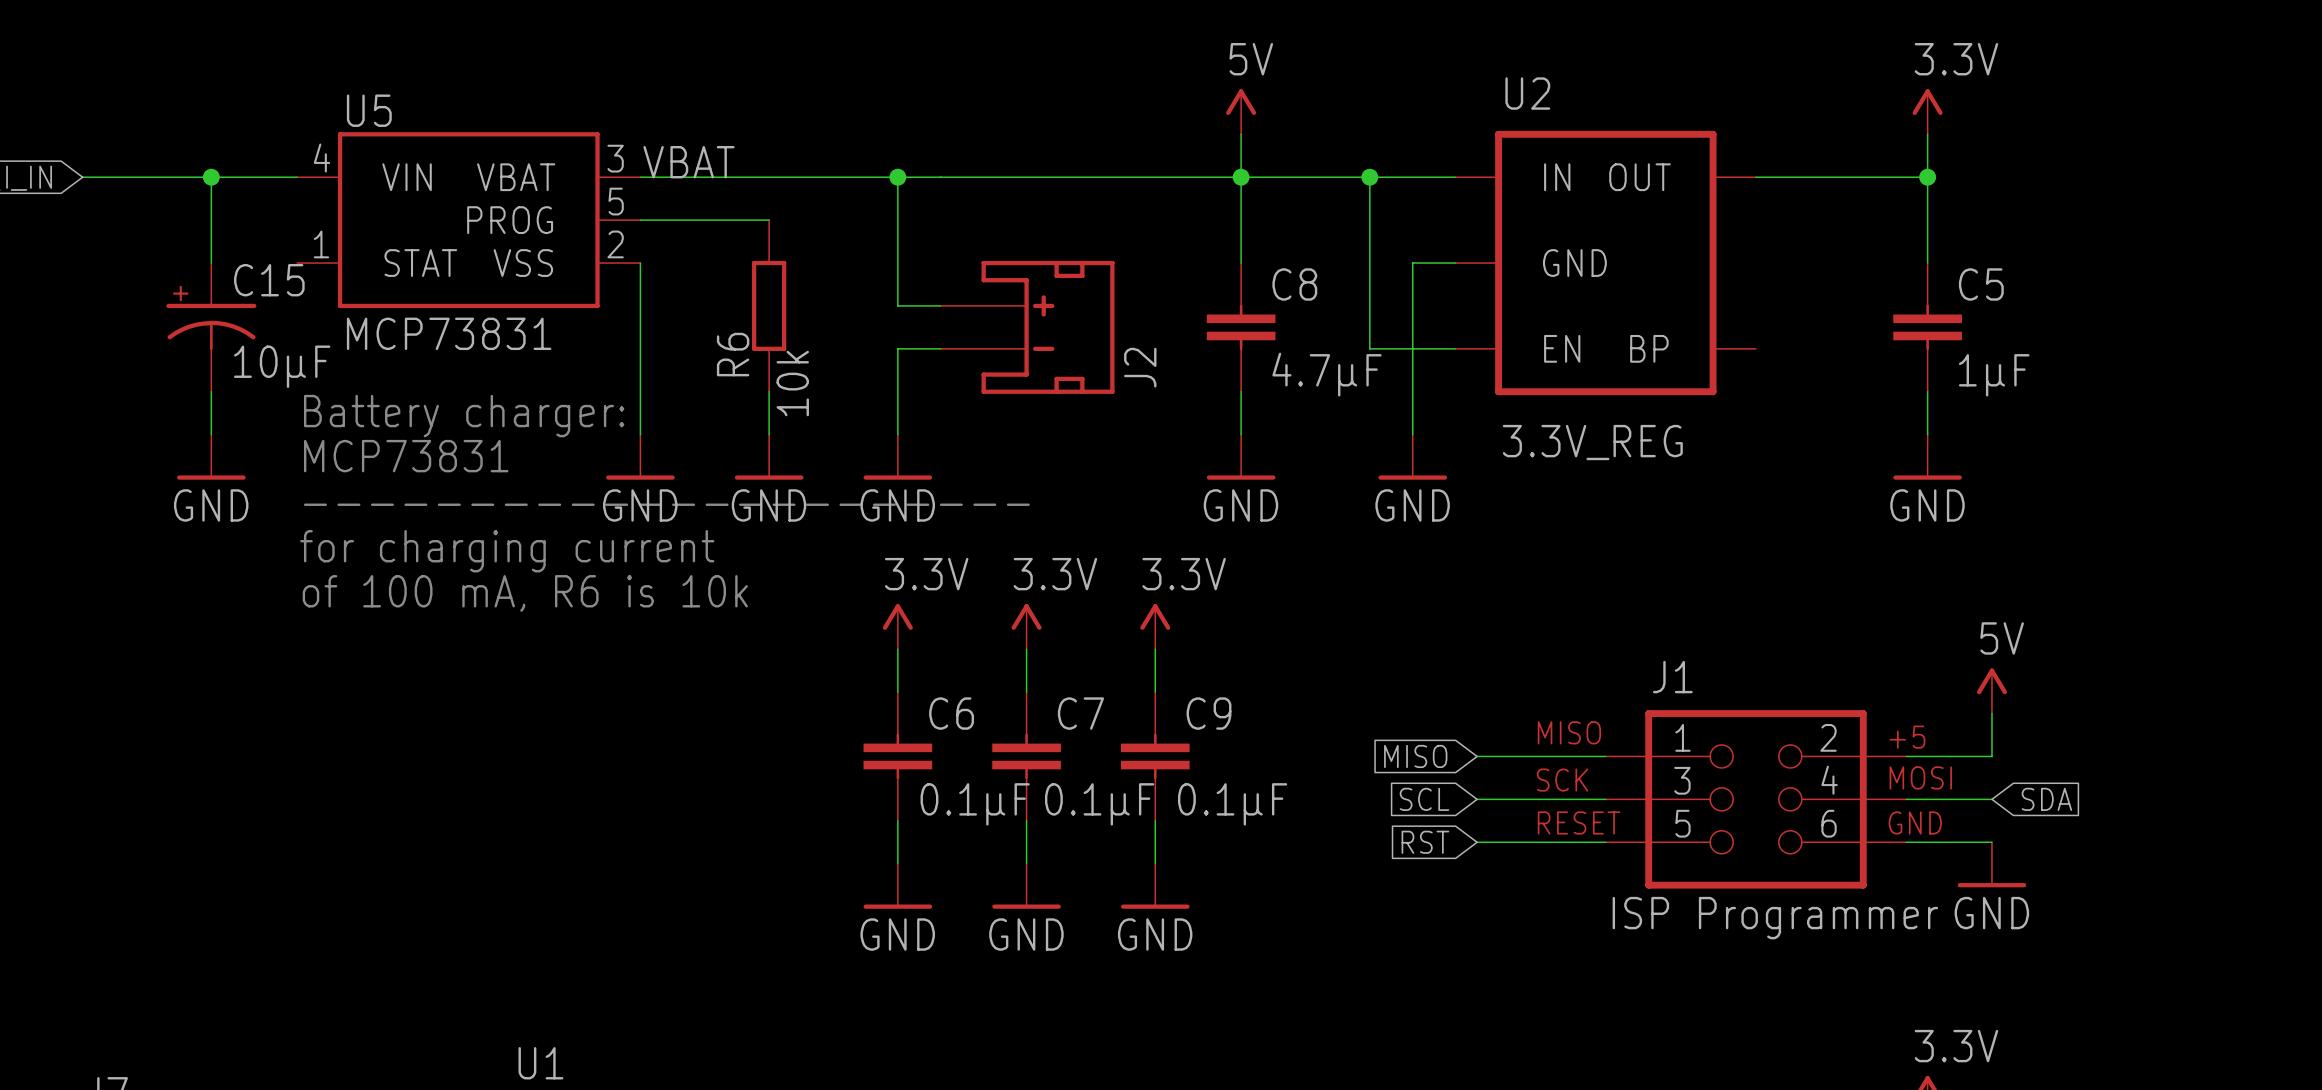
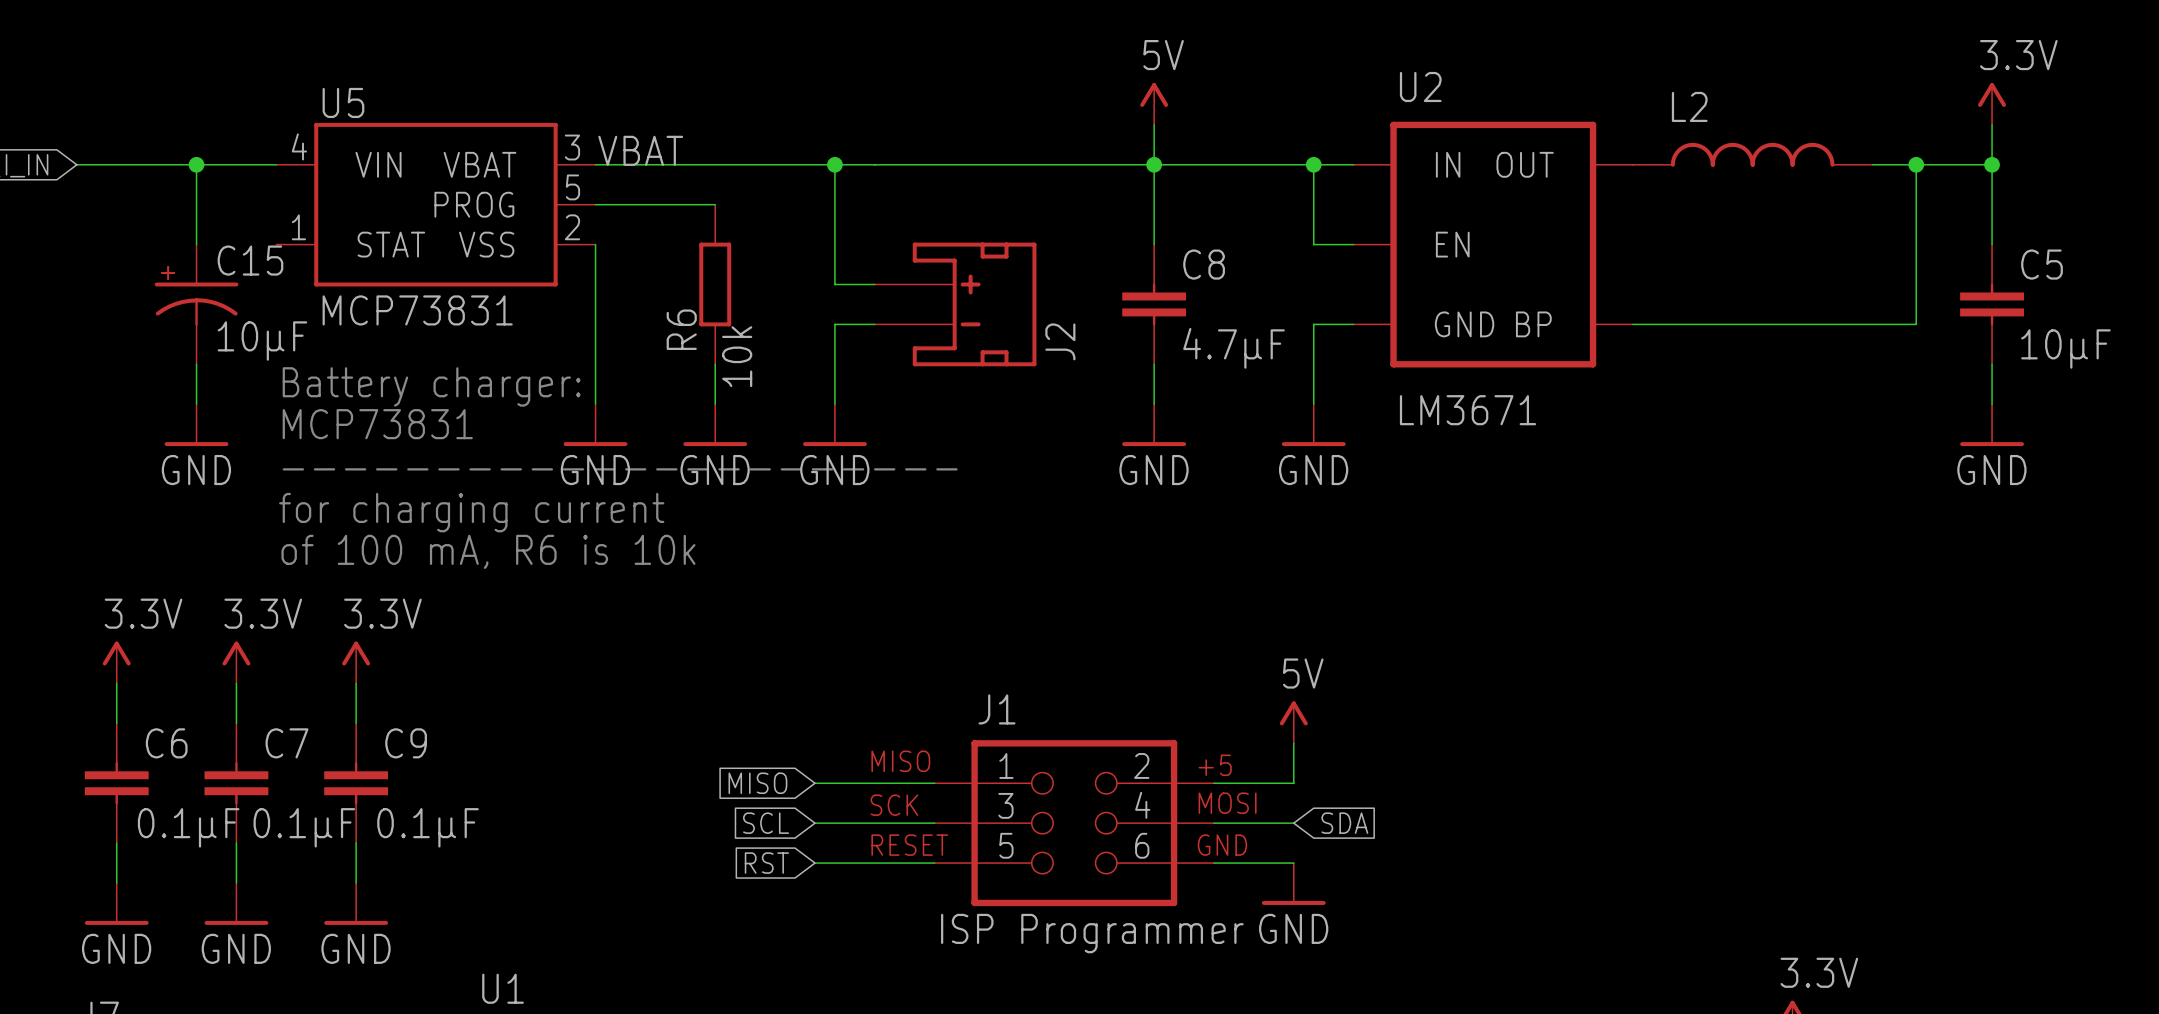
power symbol position: 3.3V (1927, 111) -> 3.3V (1992, 103)
wire: (1927, 134) (1927, 263) -> (1992, 124) (1992, 244)
L2: none -> (1752, 154)
wire: (1369, 177) (1369, 348) (1412, 348) (1412, 263) -> (1313, 164) (1313, 244)
junction position: (1369, 177) -> (1313, 164)
wire: (1755, 177) (1927, 177) -> none
junction: (1927, 177) -> none
wire: none -> (1872, 164) (1992, 164)
wire: none -> (1916, 164) (1916, 324) (1632, 324)
junction: none -> (1916, 164)
junction: none -> (1992, 164)
U2 pin name: GND (1574, 263) -> EN (1452, 244)
C5 position: (1927, 327) -> (1992, 304)
U2 pin name: EN (1562, 348) -> GND (1464, 324)
C5 value: 1μF (1994, 375) -> 10μF (2065, 349)
wire: (1927, 391) (1927, 434) -> (1992, 364) (1992, 404)
U2 value: 3.3V_REG (1592, 442) -> LM3671 (1468, 410)
power symbol position: GND (1927, 457) -> GND (1992, 425)
power symbol: 3.3V (897, 626) -> none
power symbol: 3.3V (1026, 626) -> none
power symbol: 3.3V (1155, 626) -> none
wire: (897, 649) (897, 692) -> none
wire: (1026, 649) (1026, 692) -> none
wire: (1155, 649) (1155, 692) -> none
power symbol: 5V (1991, 691) -> none
power symbol: none -> 3.3V (116, 662)
power symbol: none -> 3.3V (236, 662)
power symbol: none -> 3.3V (356, 662)
wire: (1991, 713) (1991, 756) (1906, 756) -> none
wire: none -> (116, 683) (116, 723)
wire: none -> (236, 683) (236, 723)
wire: none -> (356, 683) (356, 723)
C6 position: (897, 756) -> (116, 783)
C7 position: (1026, 756) -> (236, 783)
C9 position: (1155, 756) -> (356, 783)
global label: MISO (1415, 756) -> none
wire: (1477, 756) (1605, 756) -> none
power symbol: none -> 5V (1293, 722)
wire: none -> (1293, 743) (1293, 783) (1213, 783)
global label: SCL (1424, 799) -> none
wire: (1477, 799) (1605, 799) -> none
J1 position: (1755, 799) -> (1074, 823)
wire: (1906, 799) (1991, 799) -> none
global label: SDA (2046, 799) -> none
wire: (897, 820) (897, 863) -> none
wire: (1026, 820) (1026, 863) -> none
wire: (1155, 820) (1155, 863) -> none
global label: none -> MISO (757, 783)
wire: none -> (814, 783) (934, 783)
global label: RST (1425, 842) -> none
wire: (1477, 842) (1605, 842) -> none
wire: (1906, 842) (1991, 842) -> none
power symbol: GND (1991, 864) -> none
global label: none -> SCL (766, 823)
wire: none -> (814, 823) (934, 823)
wire: none -> (1213, 823) (1293, 823)
global label: none -> SDA (1344, 823)
power symbol: GND (897, 886) -> none
power symbol: GND (1026, 886) -> none
power symbol: GND (1155, 886) -> none
wire: none -> (116, 843) (116, 883)
wire: none -> (236, 843) (236, 883)
wire: none -> (356, 843) (356, 883)
global label: none -> RST (766, 863)
wire: none -> (814, 863) (934, 863)
wire: none -> (1213, 863) (1293, 863)
power symbol: none -> GND (1293, 884)
power symbol: none -> GND (116, 903)
power symbol: none -> GND (236, 903)
power symbol: none -> GND (356, 903)

